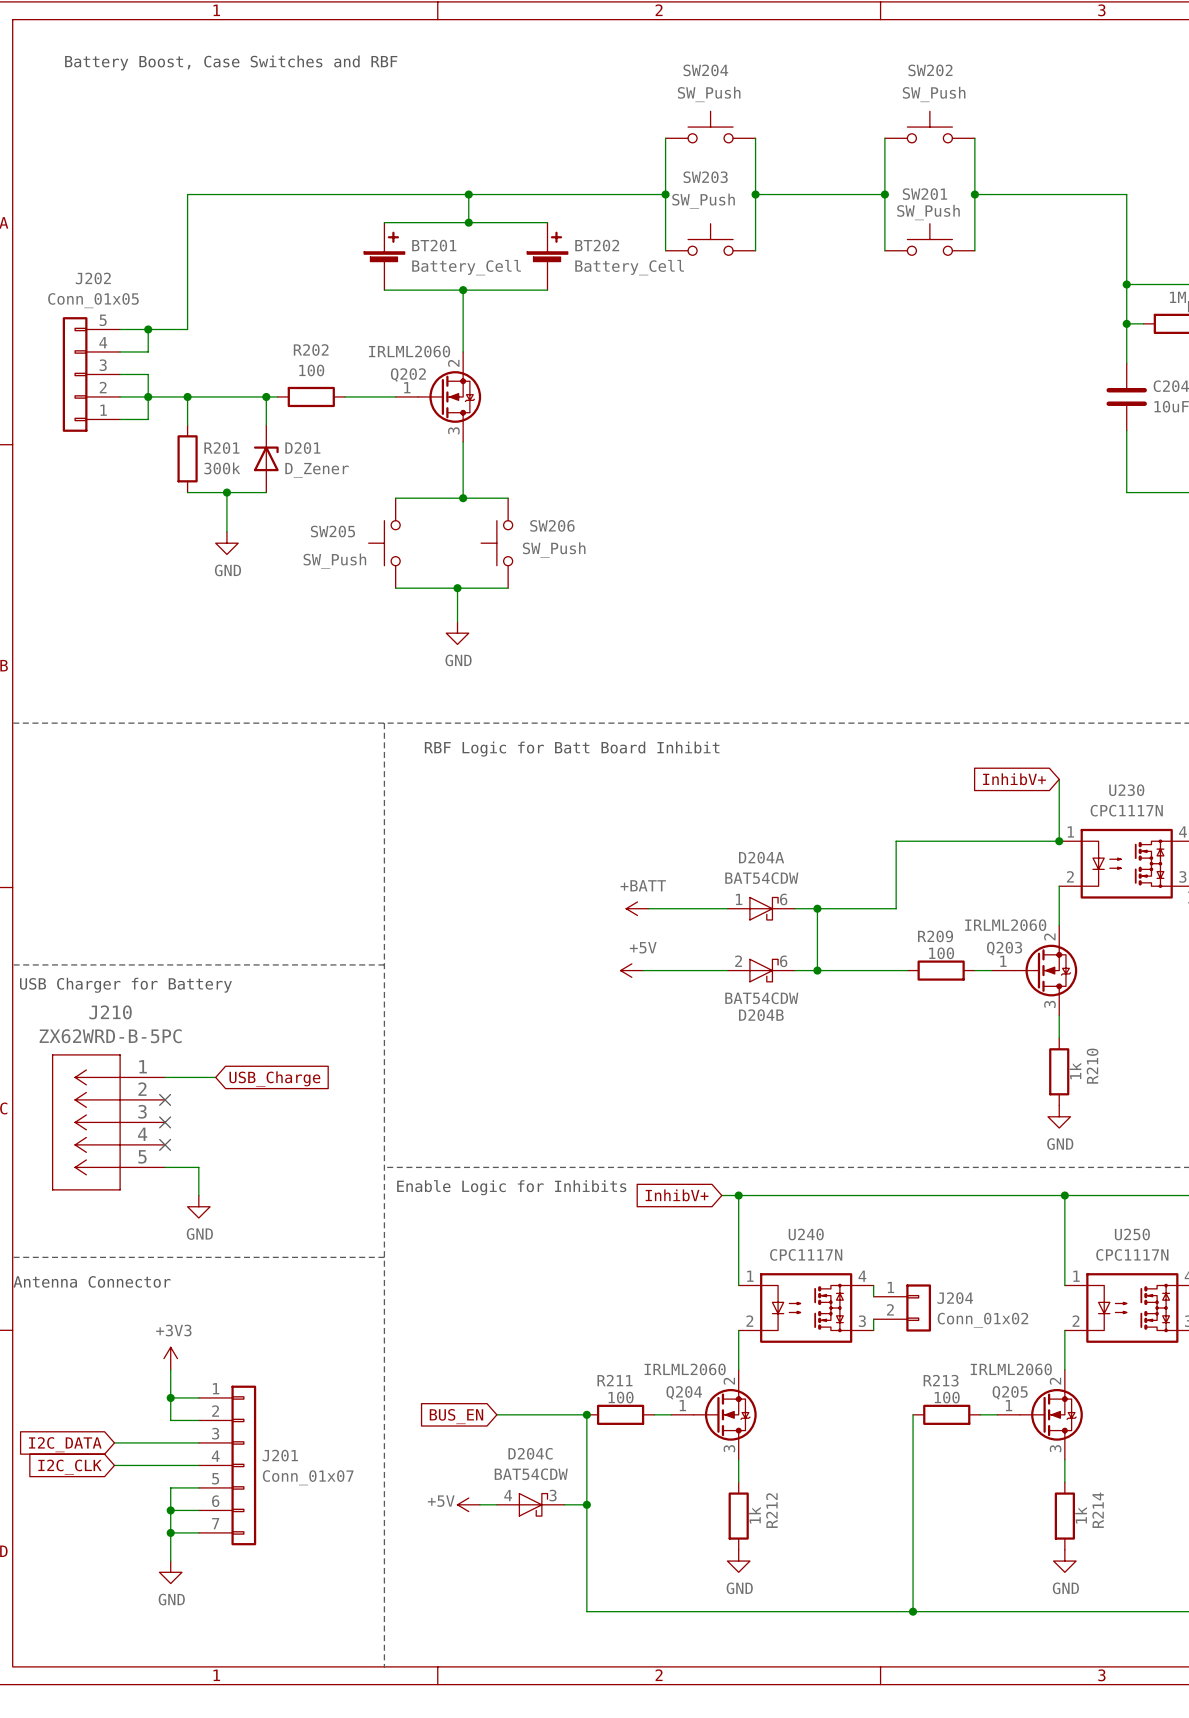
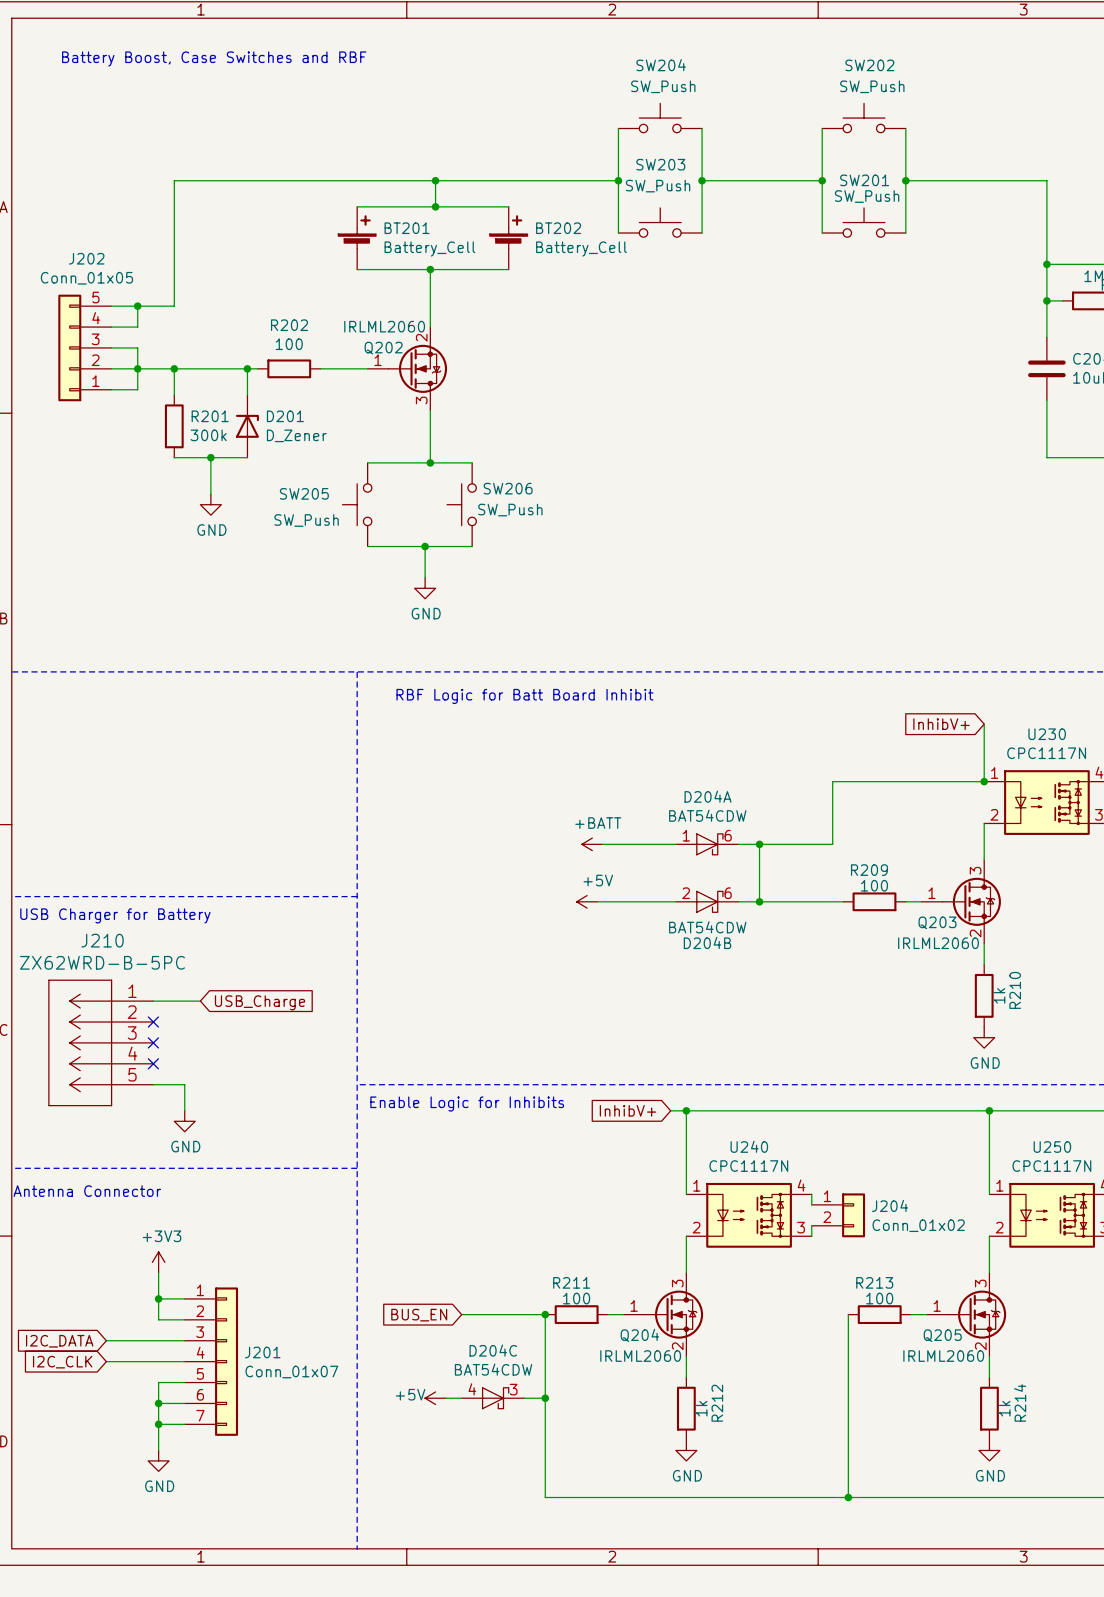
Q203 flip: as is (1045, 970) -> up-down (971, 901)
Q204 flip: as is (725, 1414) -> up-down (673, 1314)
Q205 flip: as is (1051, 1414) -> up-down (976, 1314)

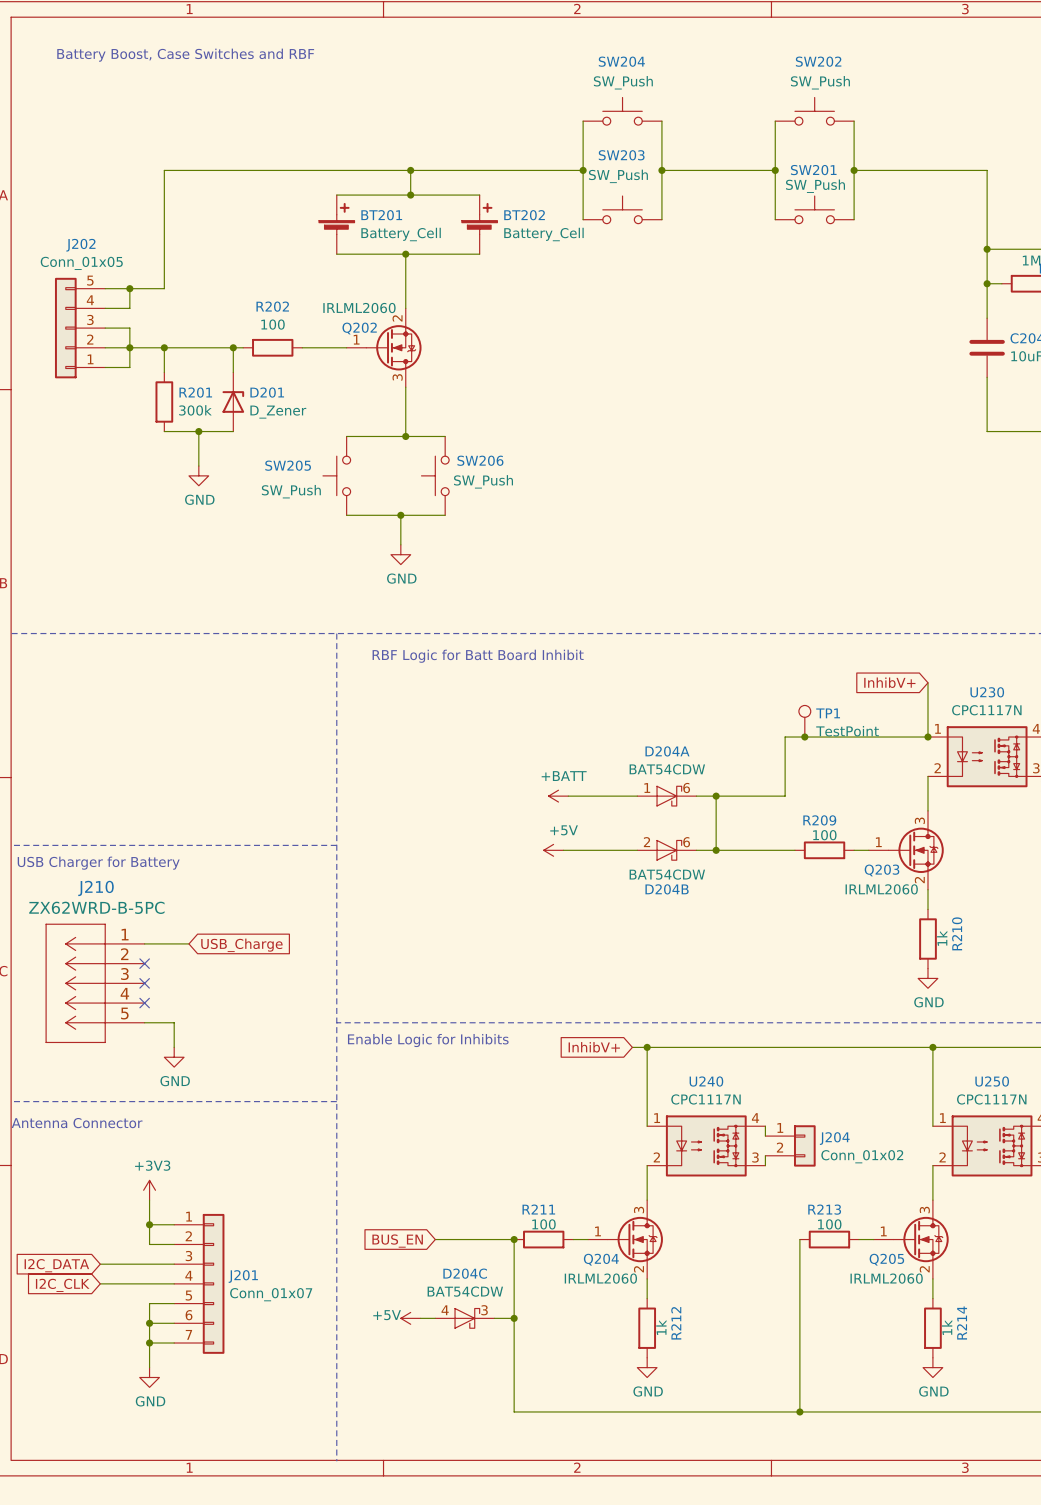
TP1: none -> TestPoint (804, 721)
junction: none -> (804, 737)

